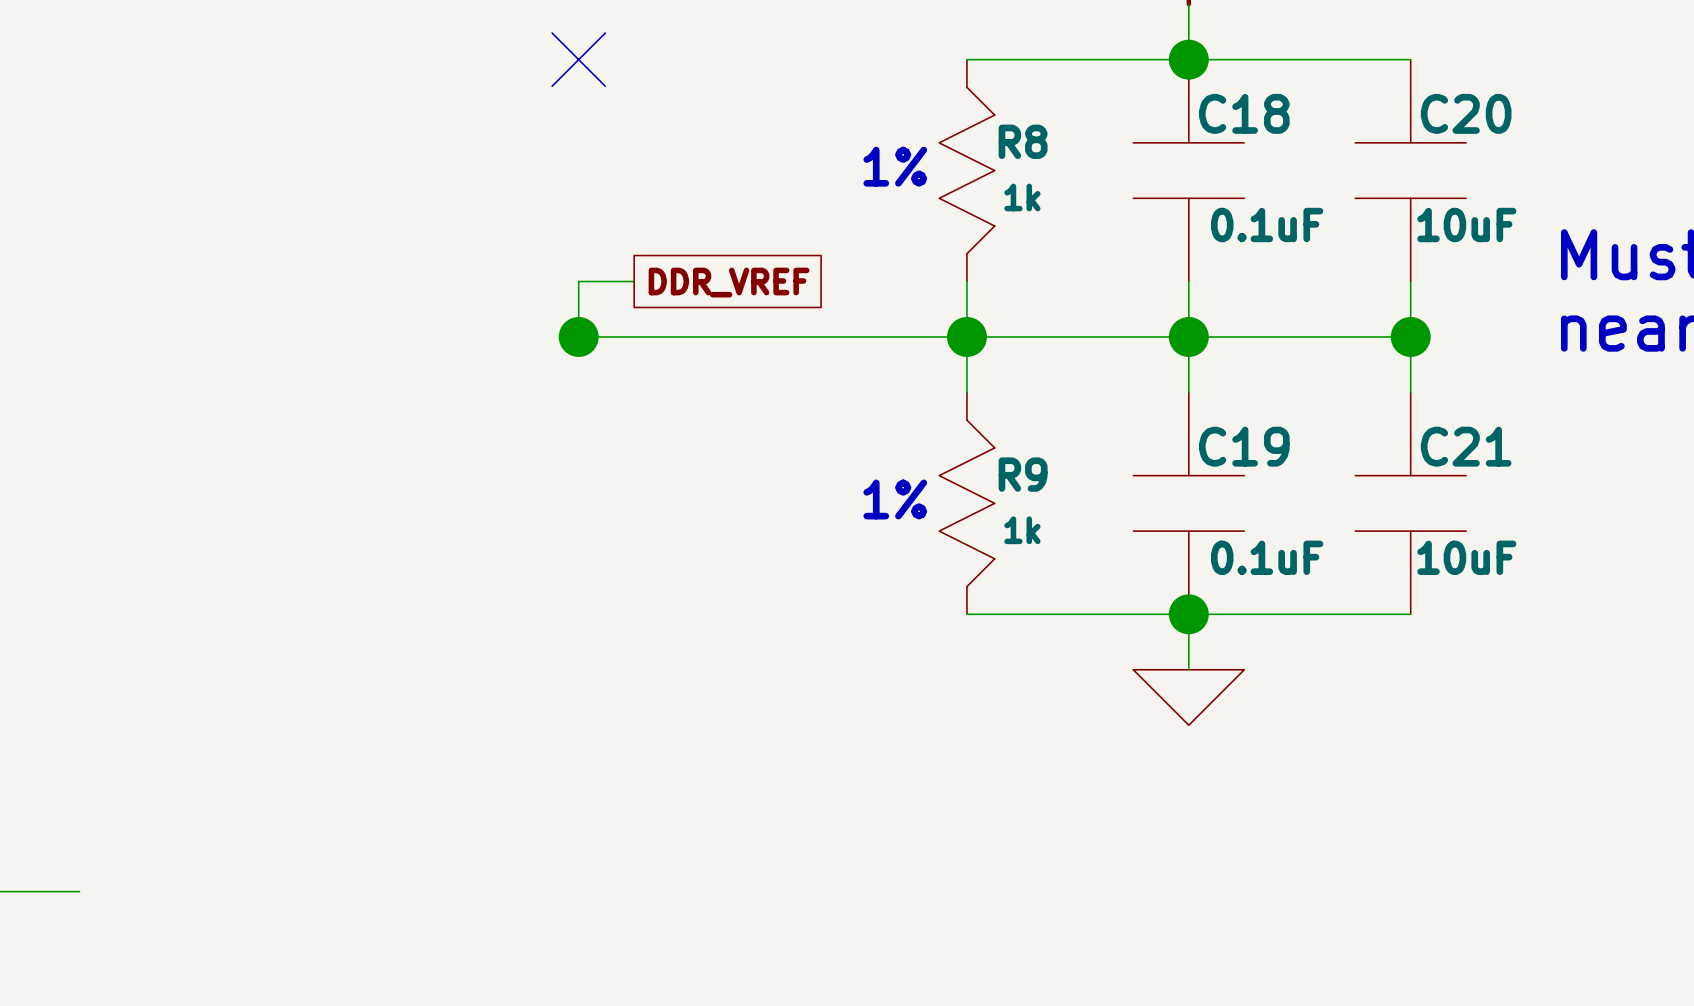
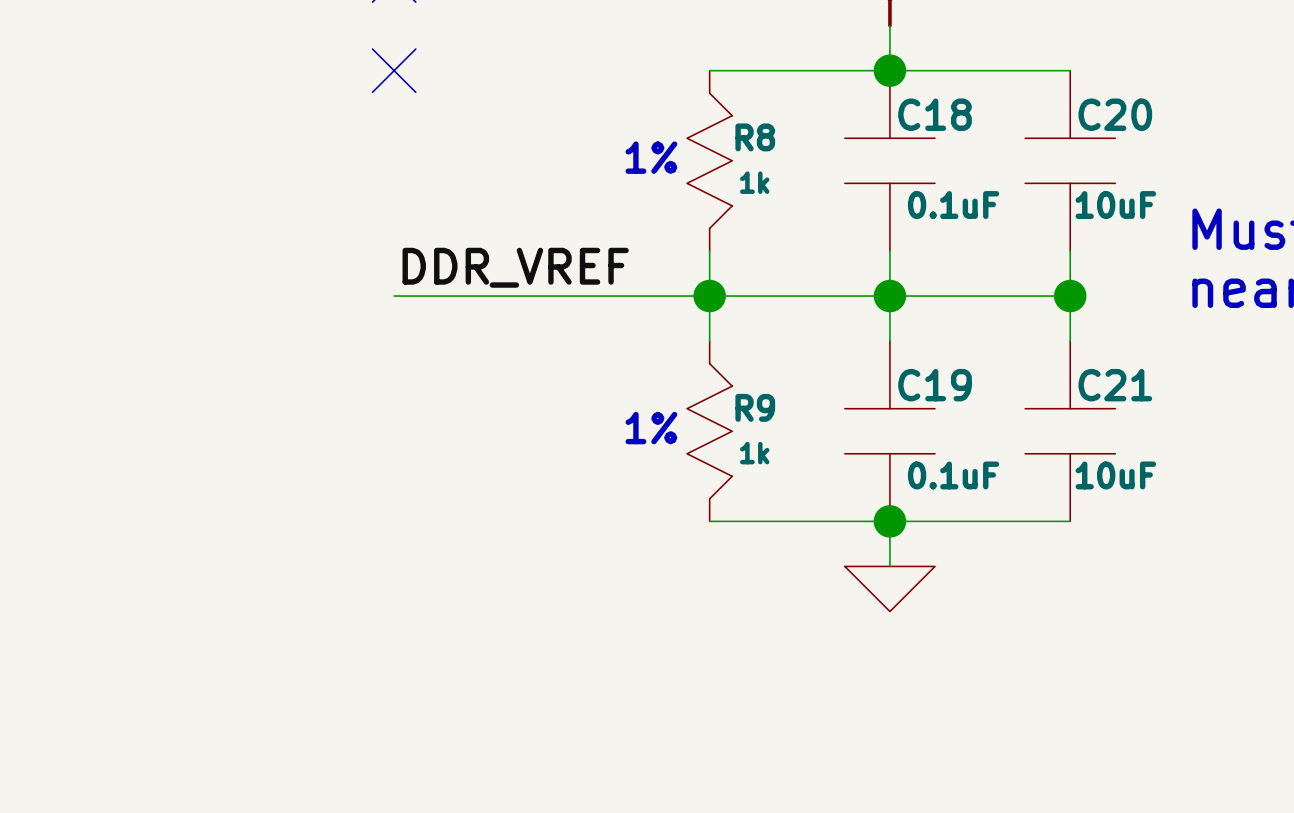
wire: (634, 281) (578, 281) (578, 336) -> none
global label: DDR_VREF (729, 282) -> none
label: none -> DDR_VREF (515, 267)
junction: (578, 336) -> none

